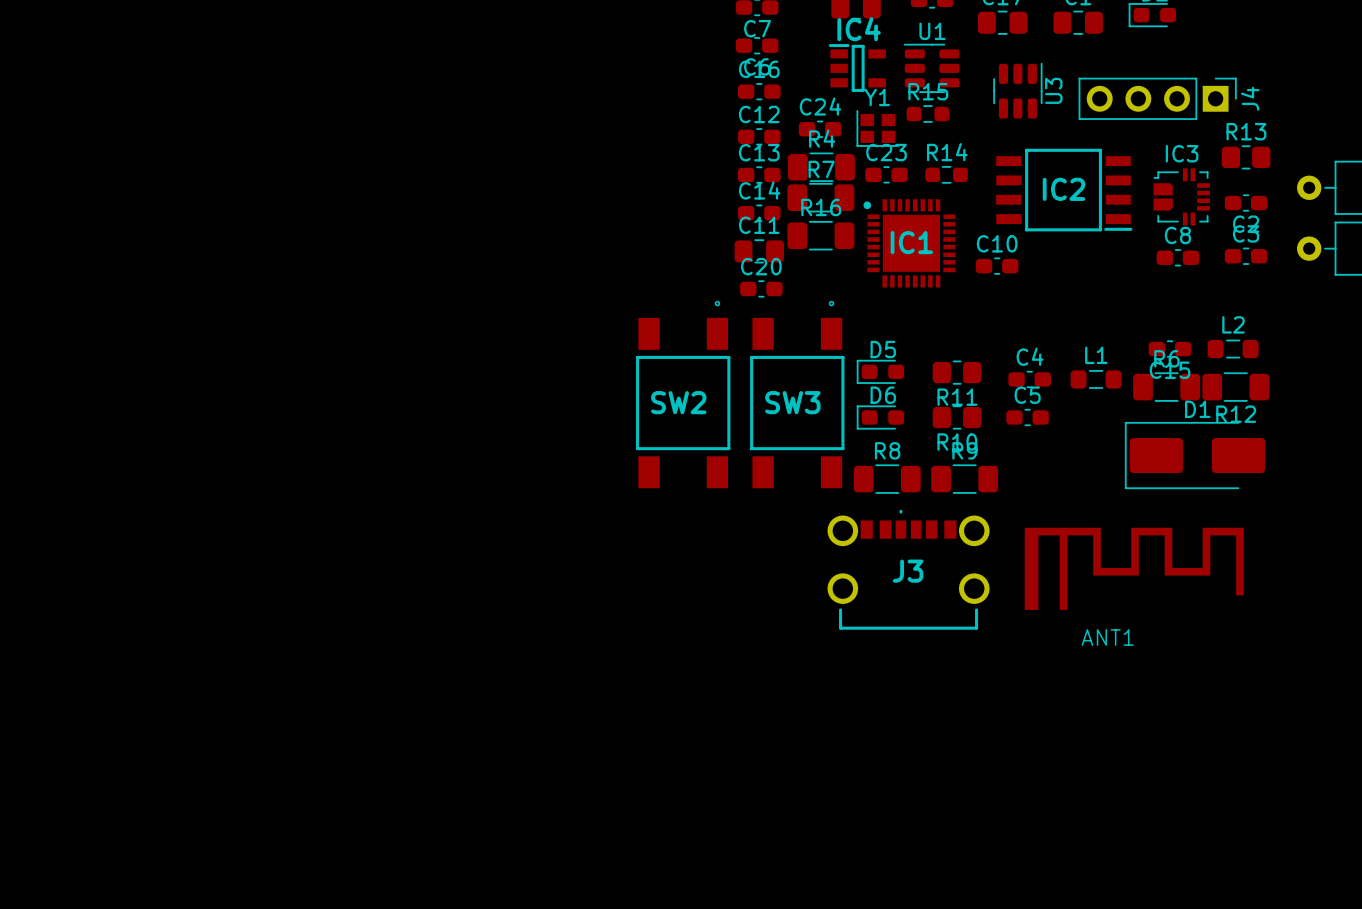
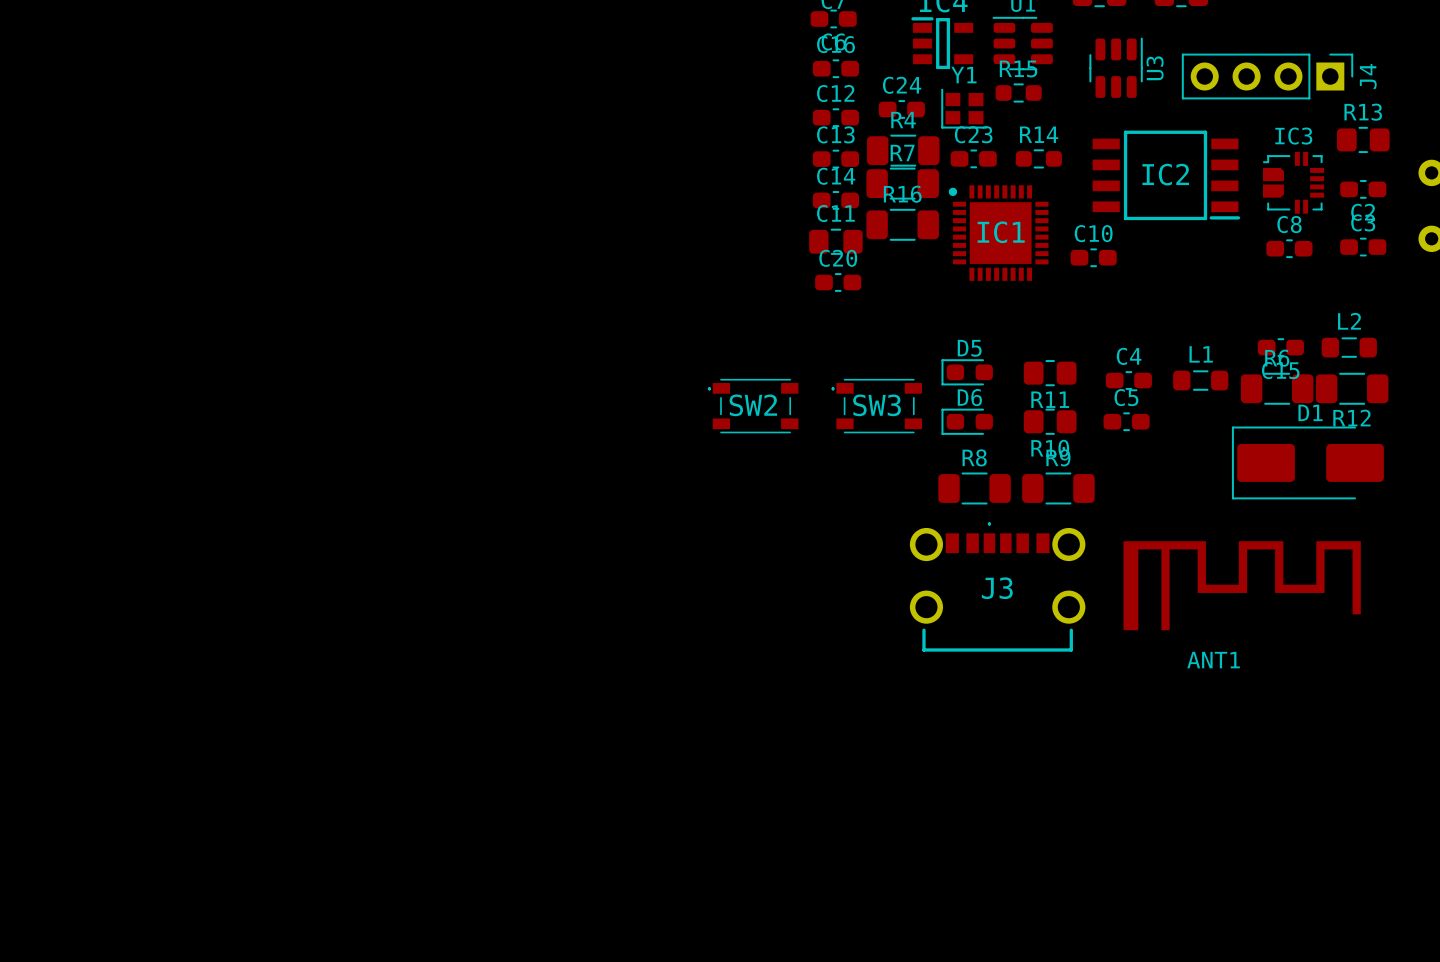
SW2 footprint: [636, 300, 731, 489] -> [707, 378, 799, 434]
SW3 footprint: [750, 300, 845, 489] -> [831, 378, 923, 434]

